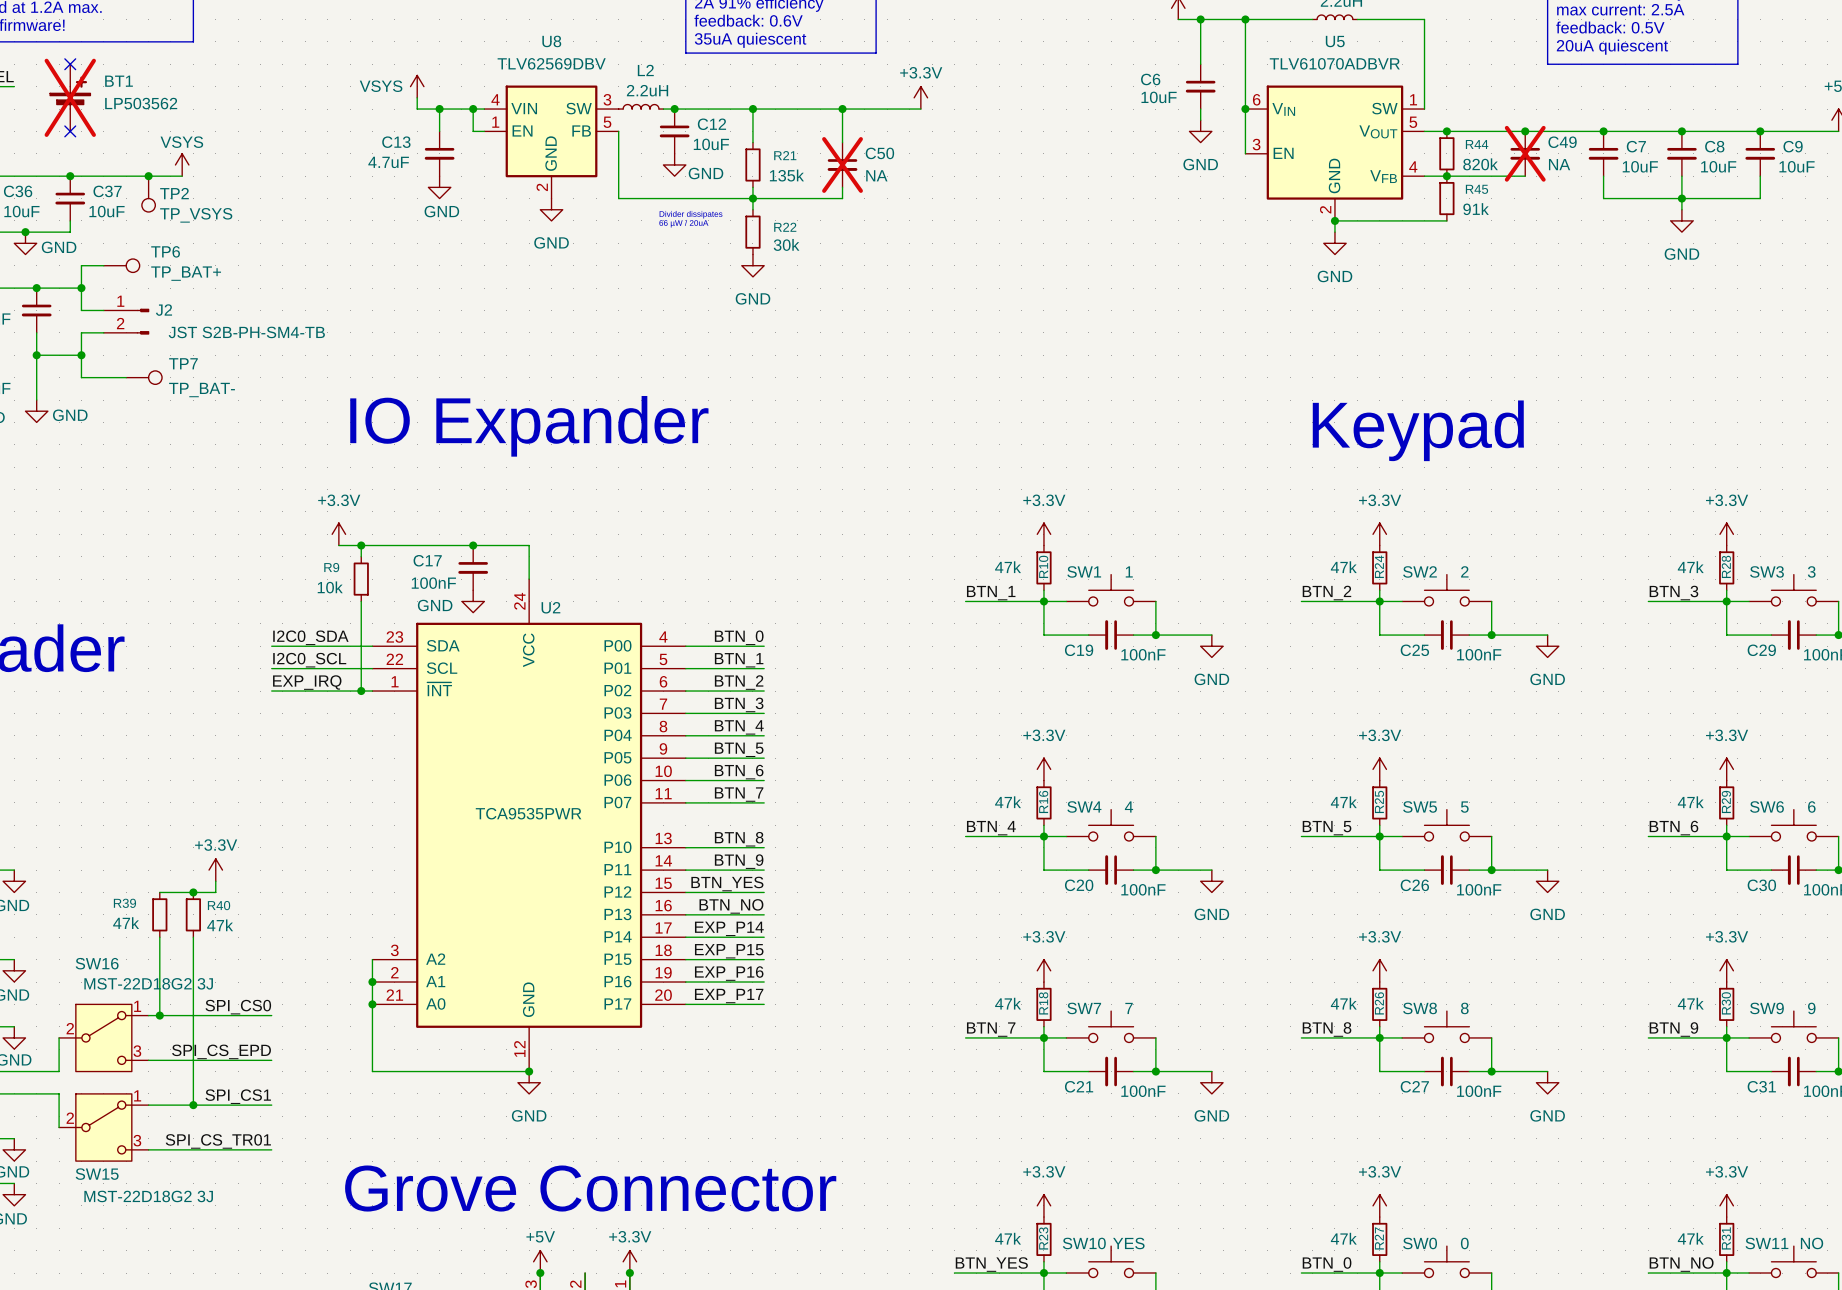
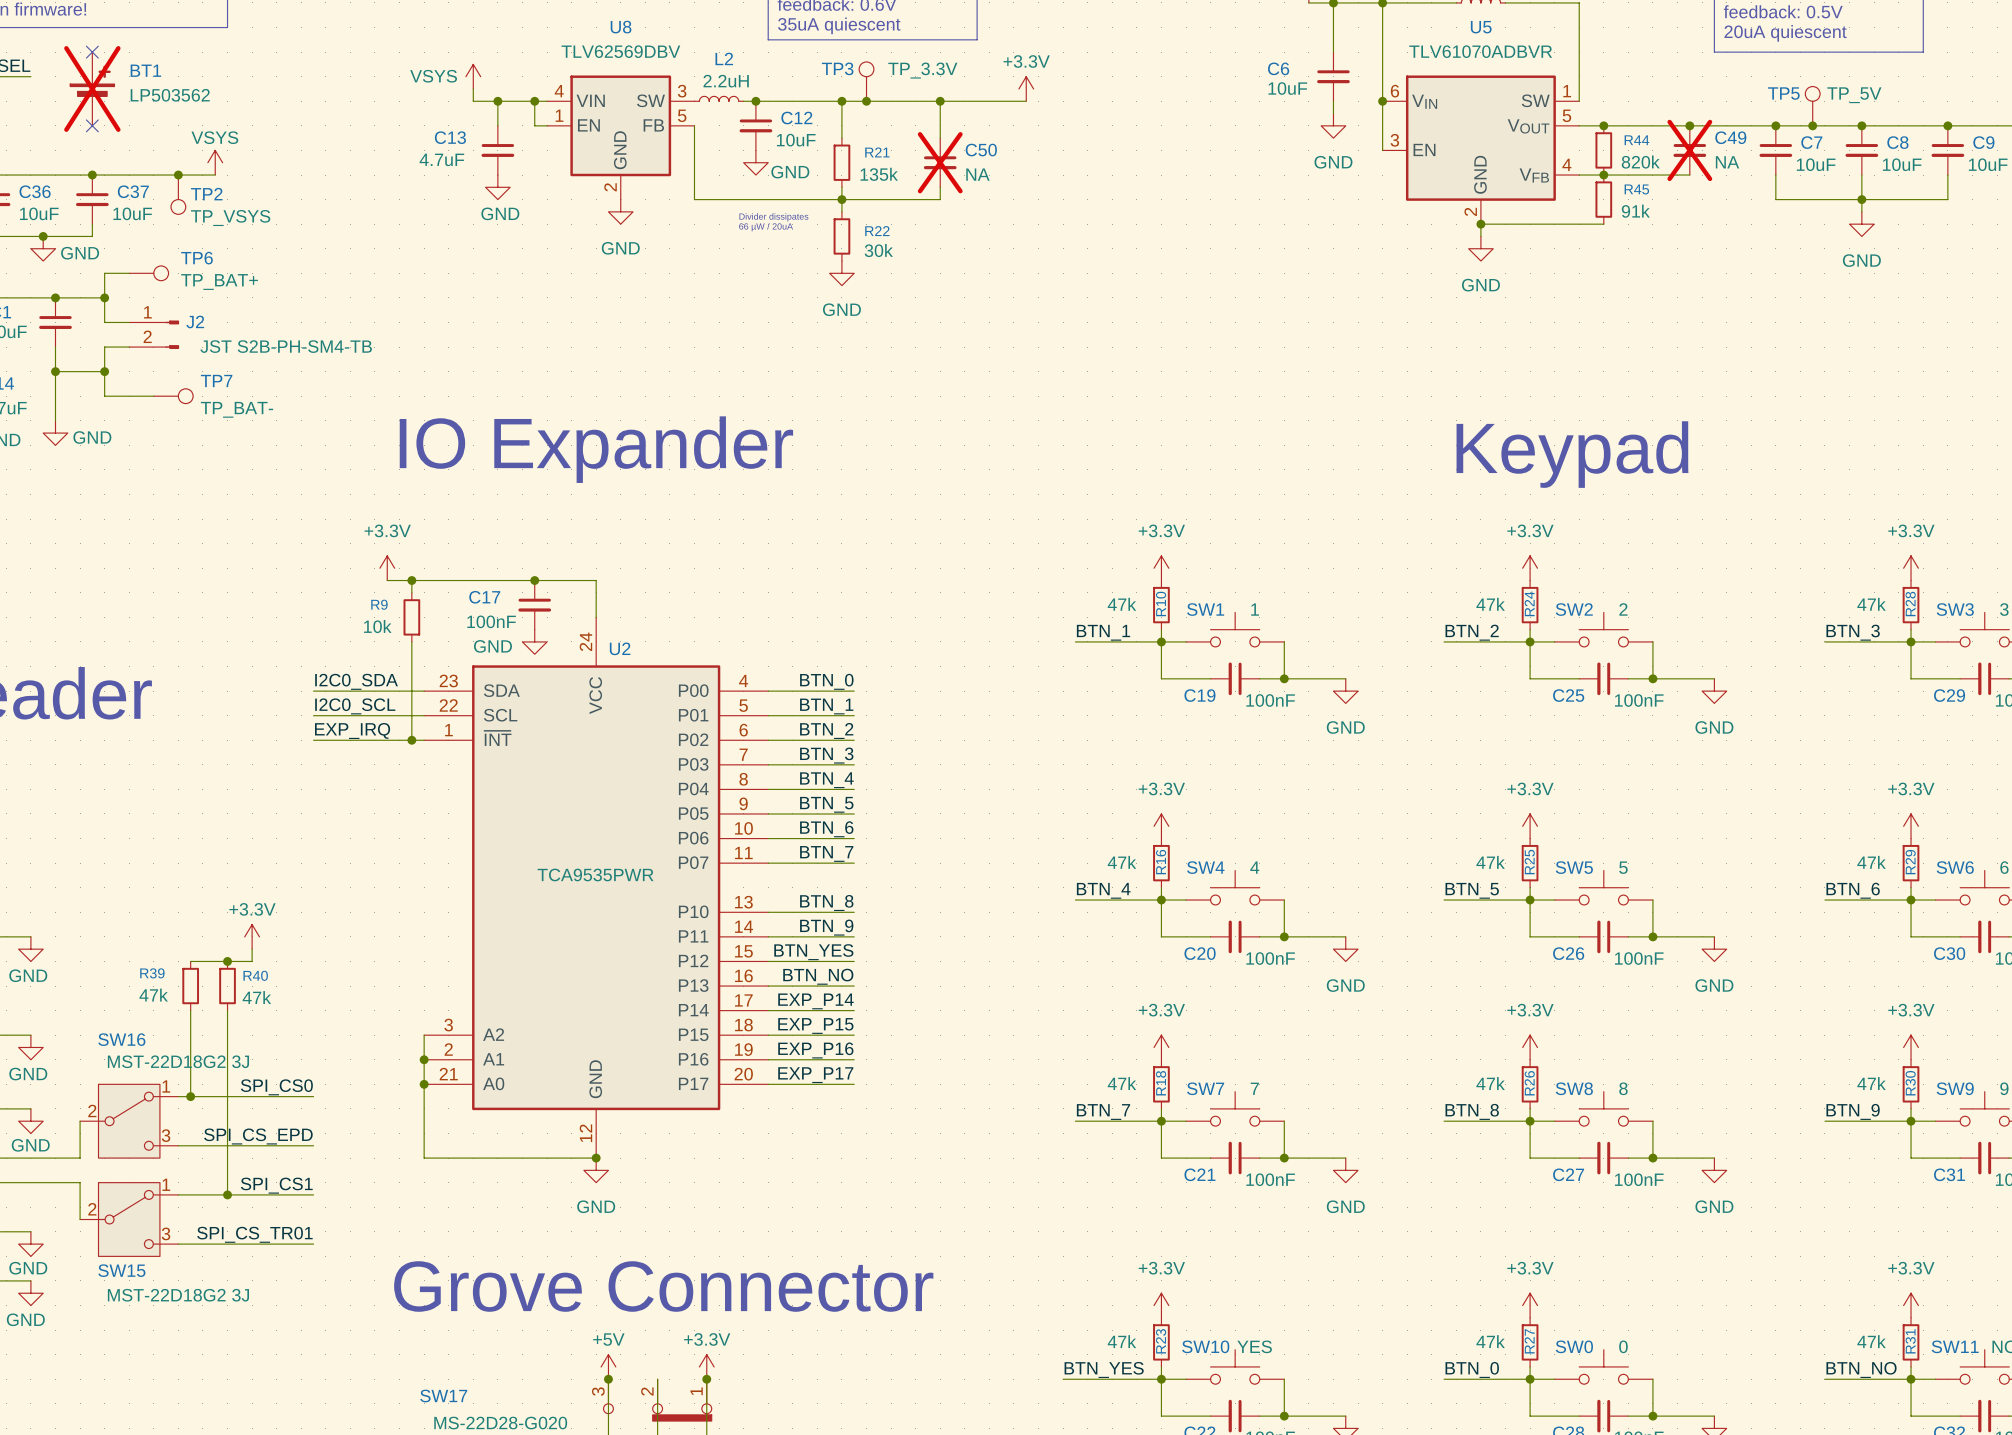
TP3: none -> TP_3.3V (866, 81)
junction: none -> (866, 101)
TP5: none -> TP_5V (1812, 106)
junction: none -> (1812, 125)

